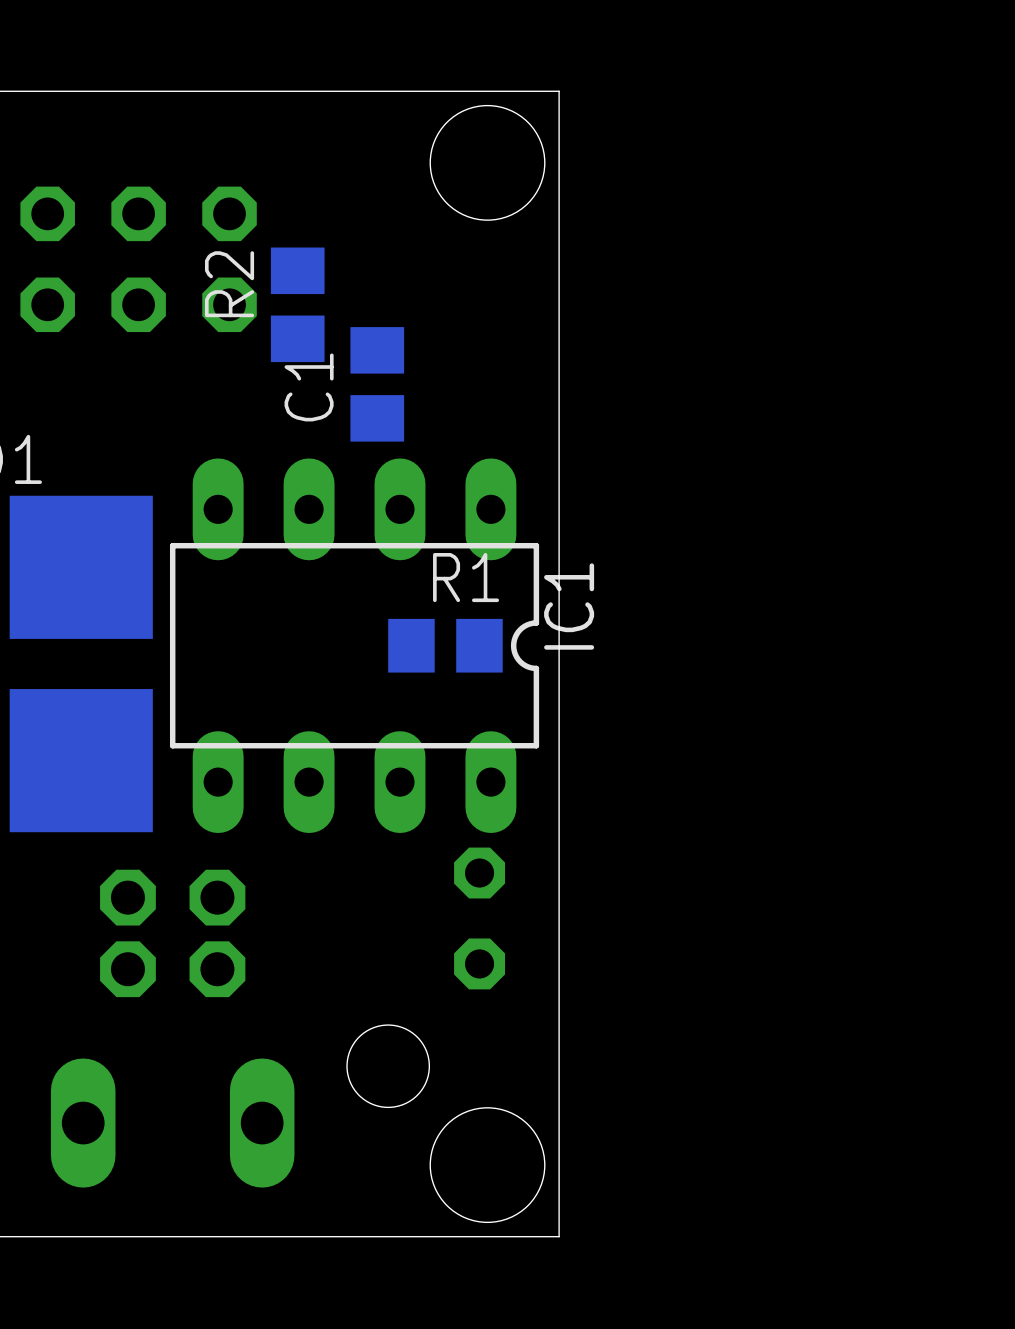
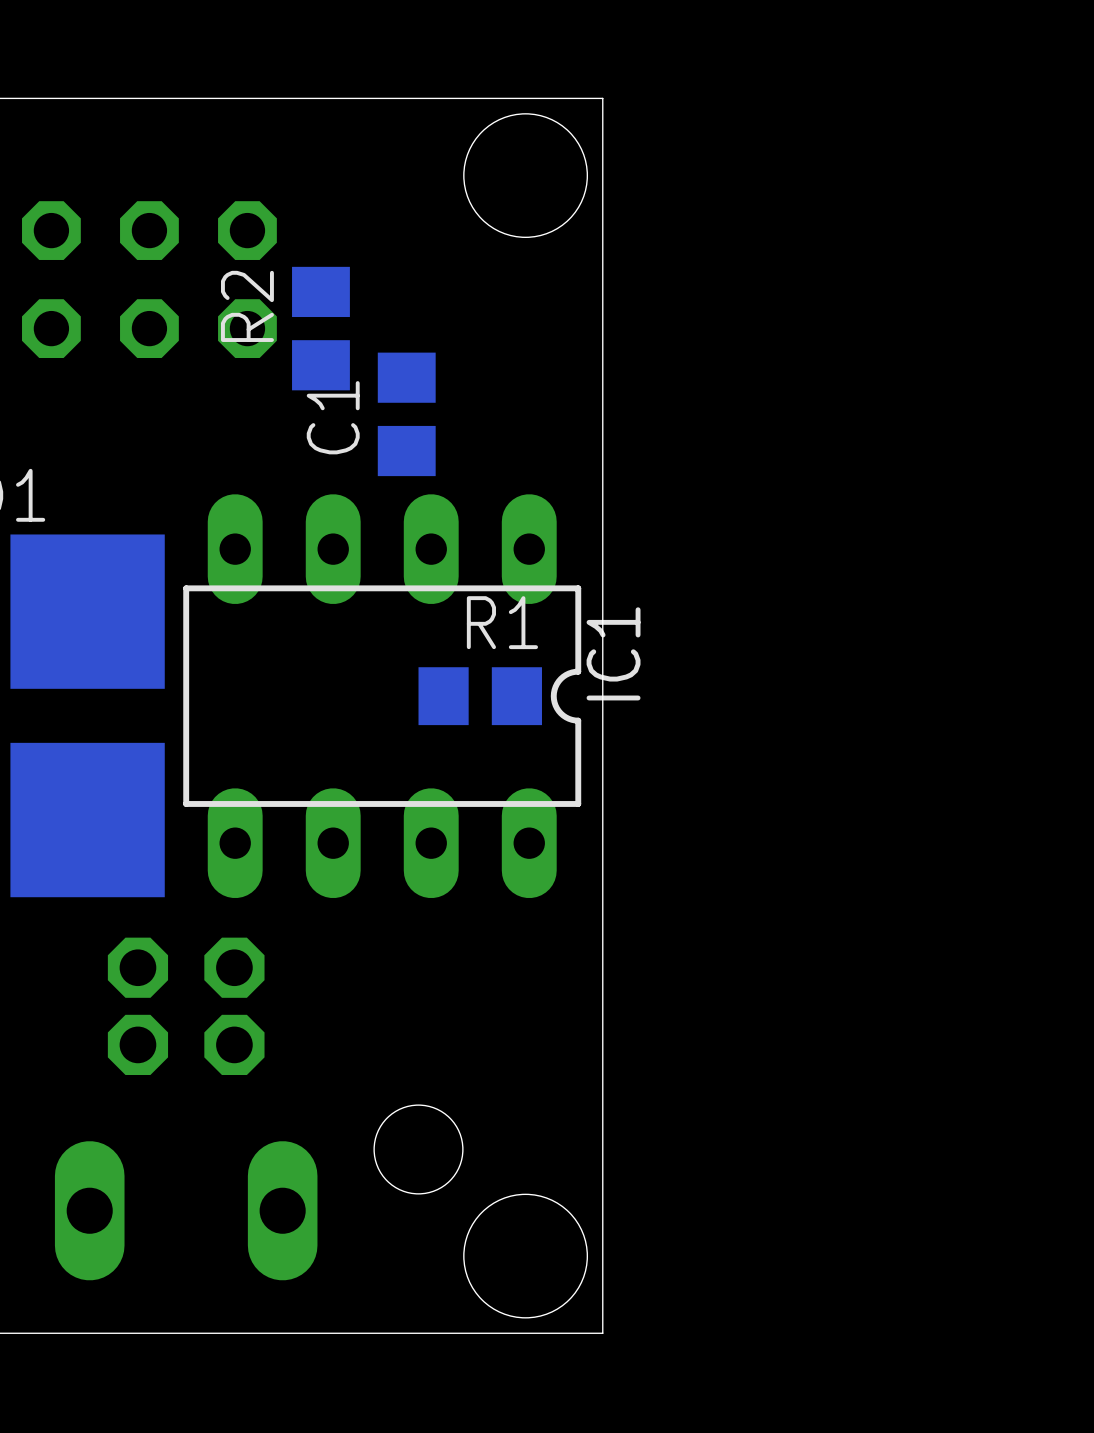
part: (479, 918) -> none

